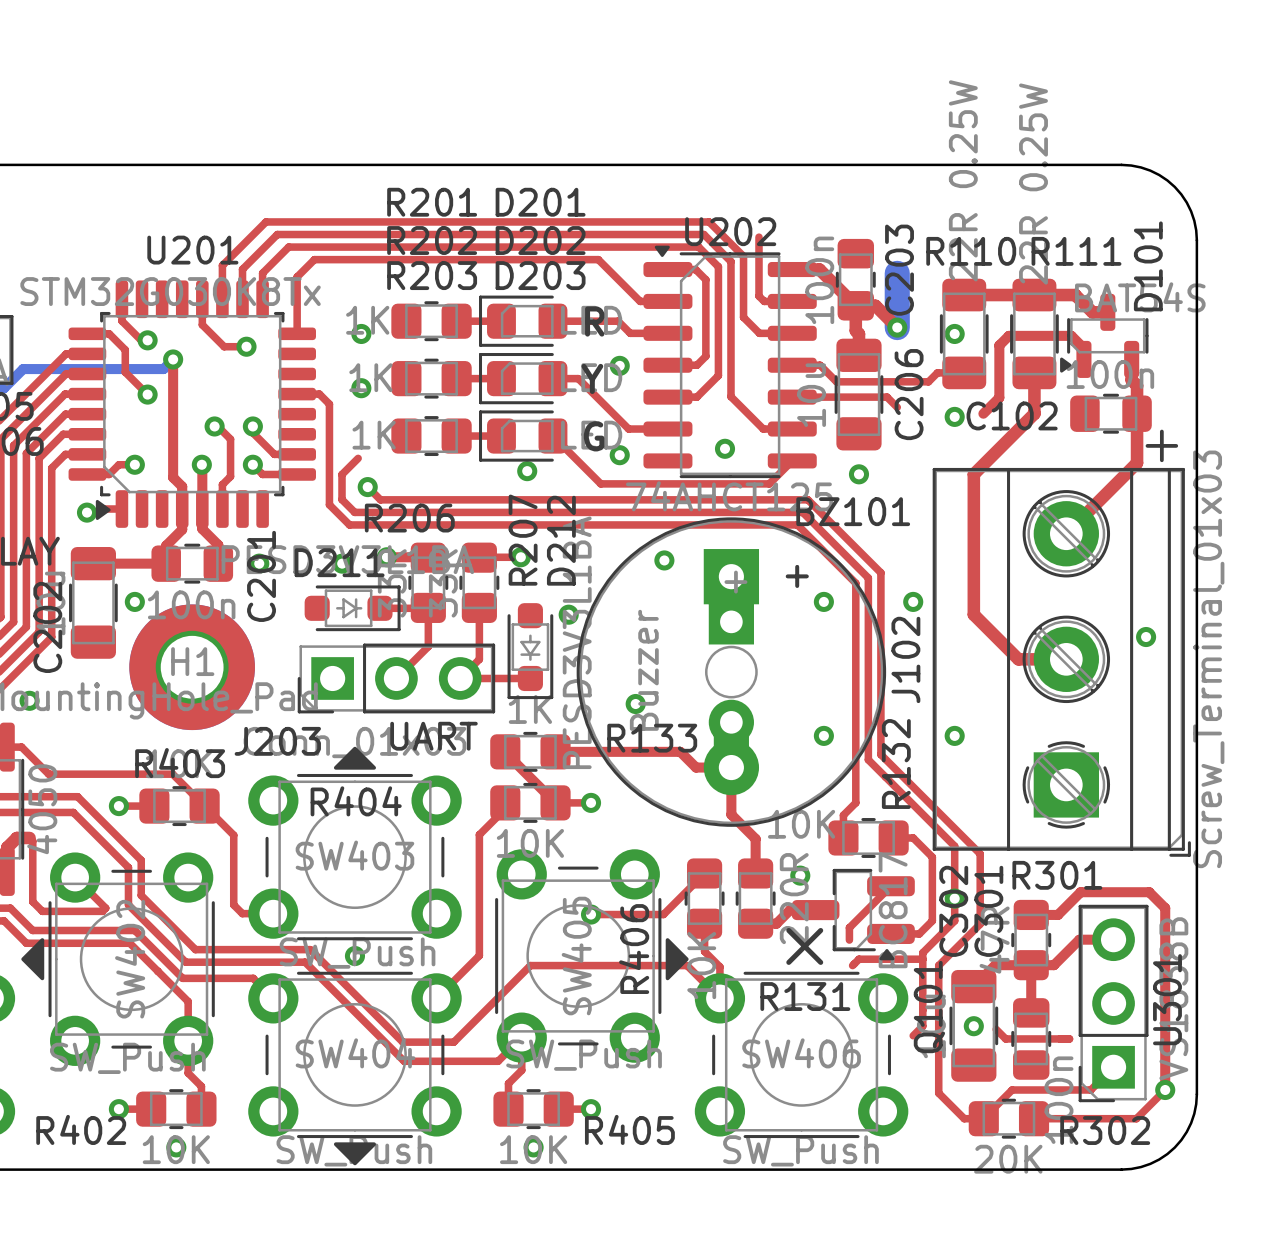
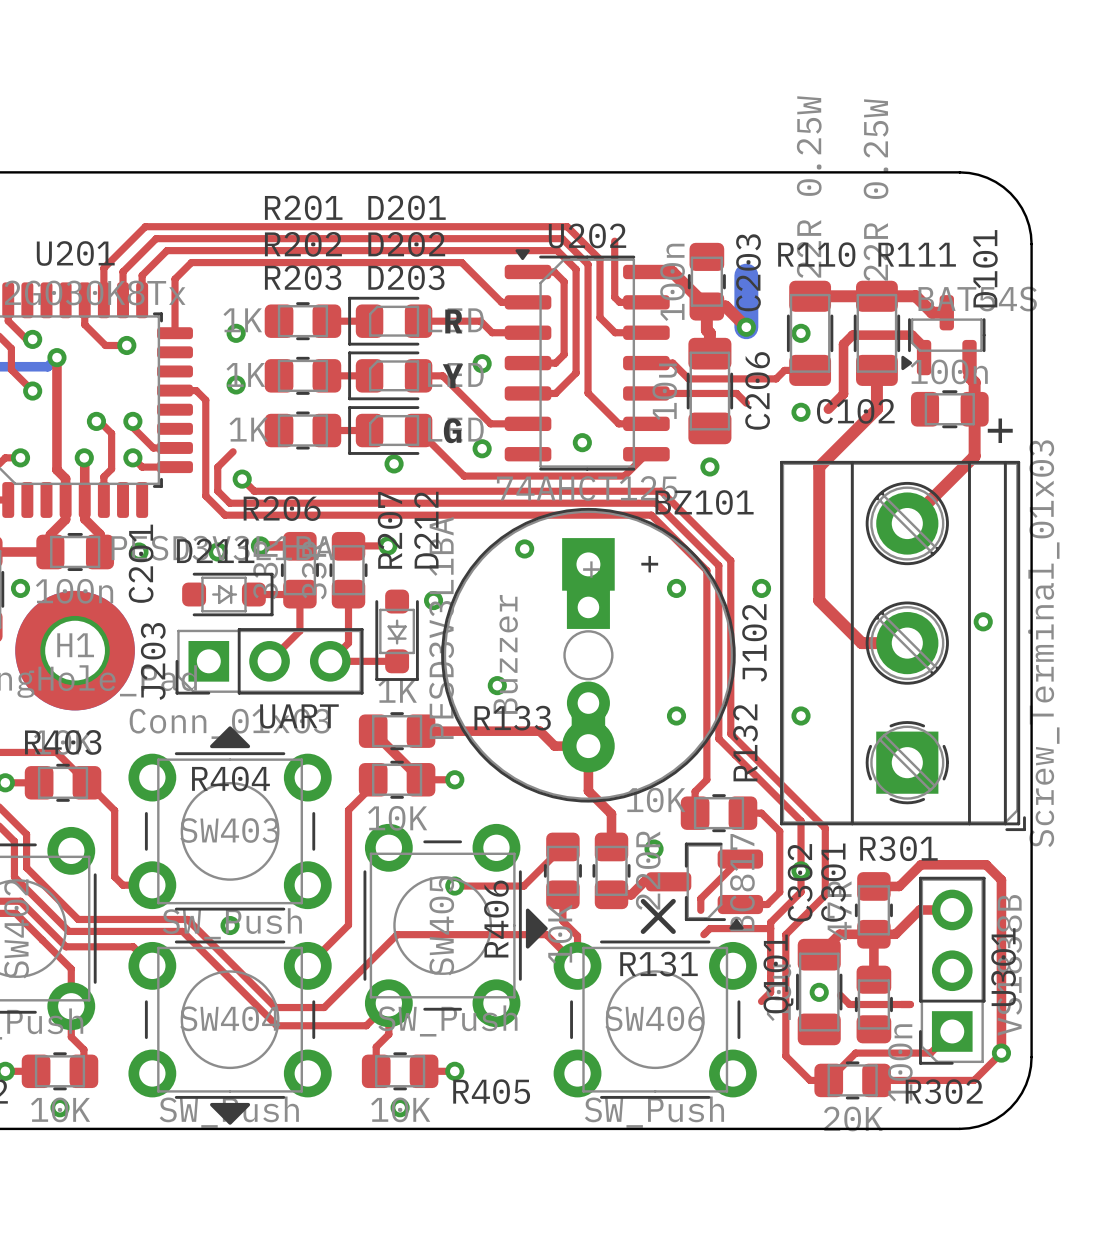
J203 name rotation: 0° (277, 741) -> 90° counterclockwise (153, 661)

